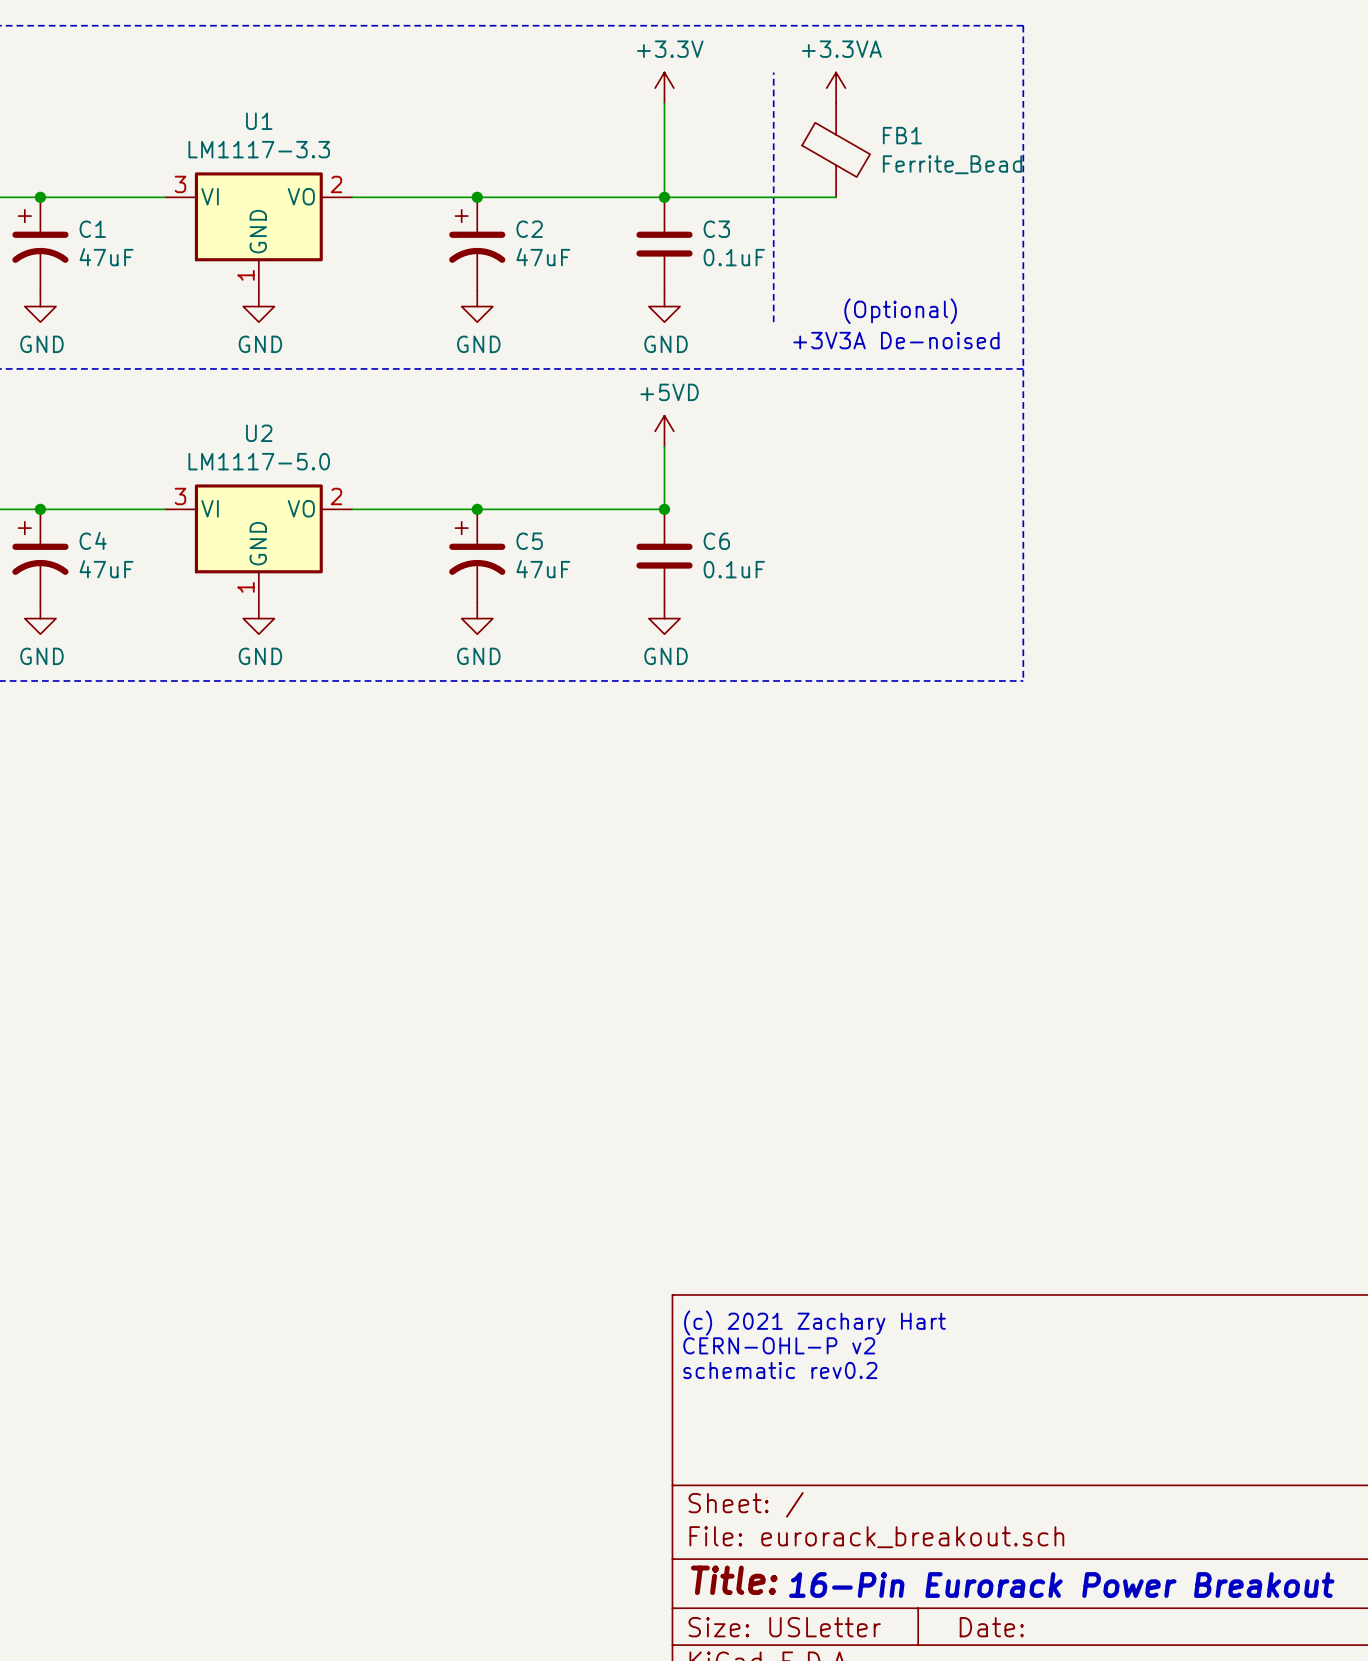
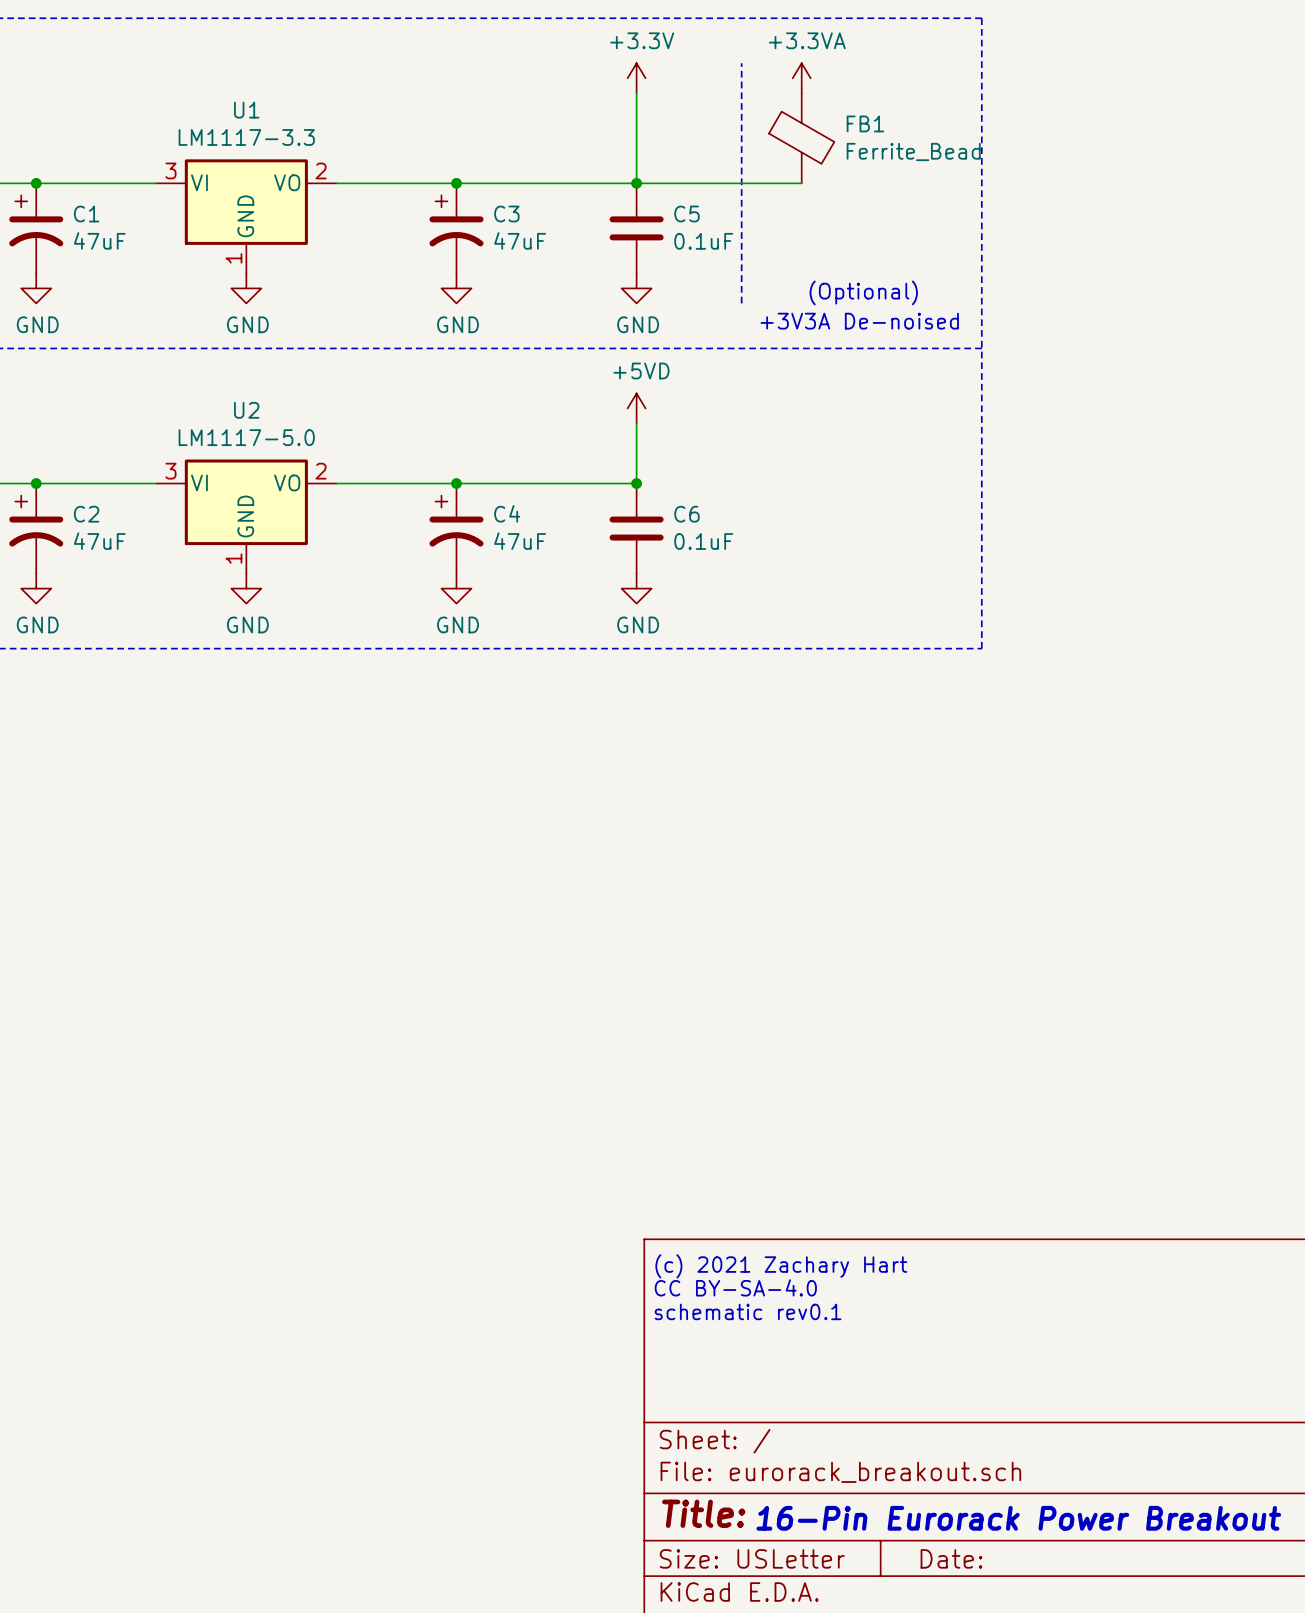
C2 name: C2 (529, 229) -> C3 (506, 214)
C3 name: C3 (716, 229) -> C5 (686, 214)
C4 name: C4 (93, 540) -> C2 (86, 514)
C5 name: C5 (529, 541) -> C4 (507, 513)
text: CERN-OHL-P v2 (779, 1345) -> CC BY-SA-4.0 (735, 1287)
text: schematic rev0.2 (780, 1370) -> schematic rev0.1 (748, 1311)

